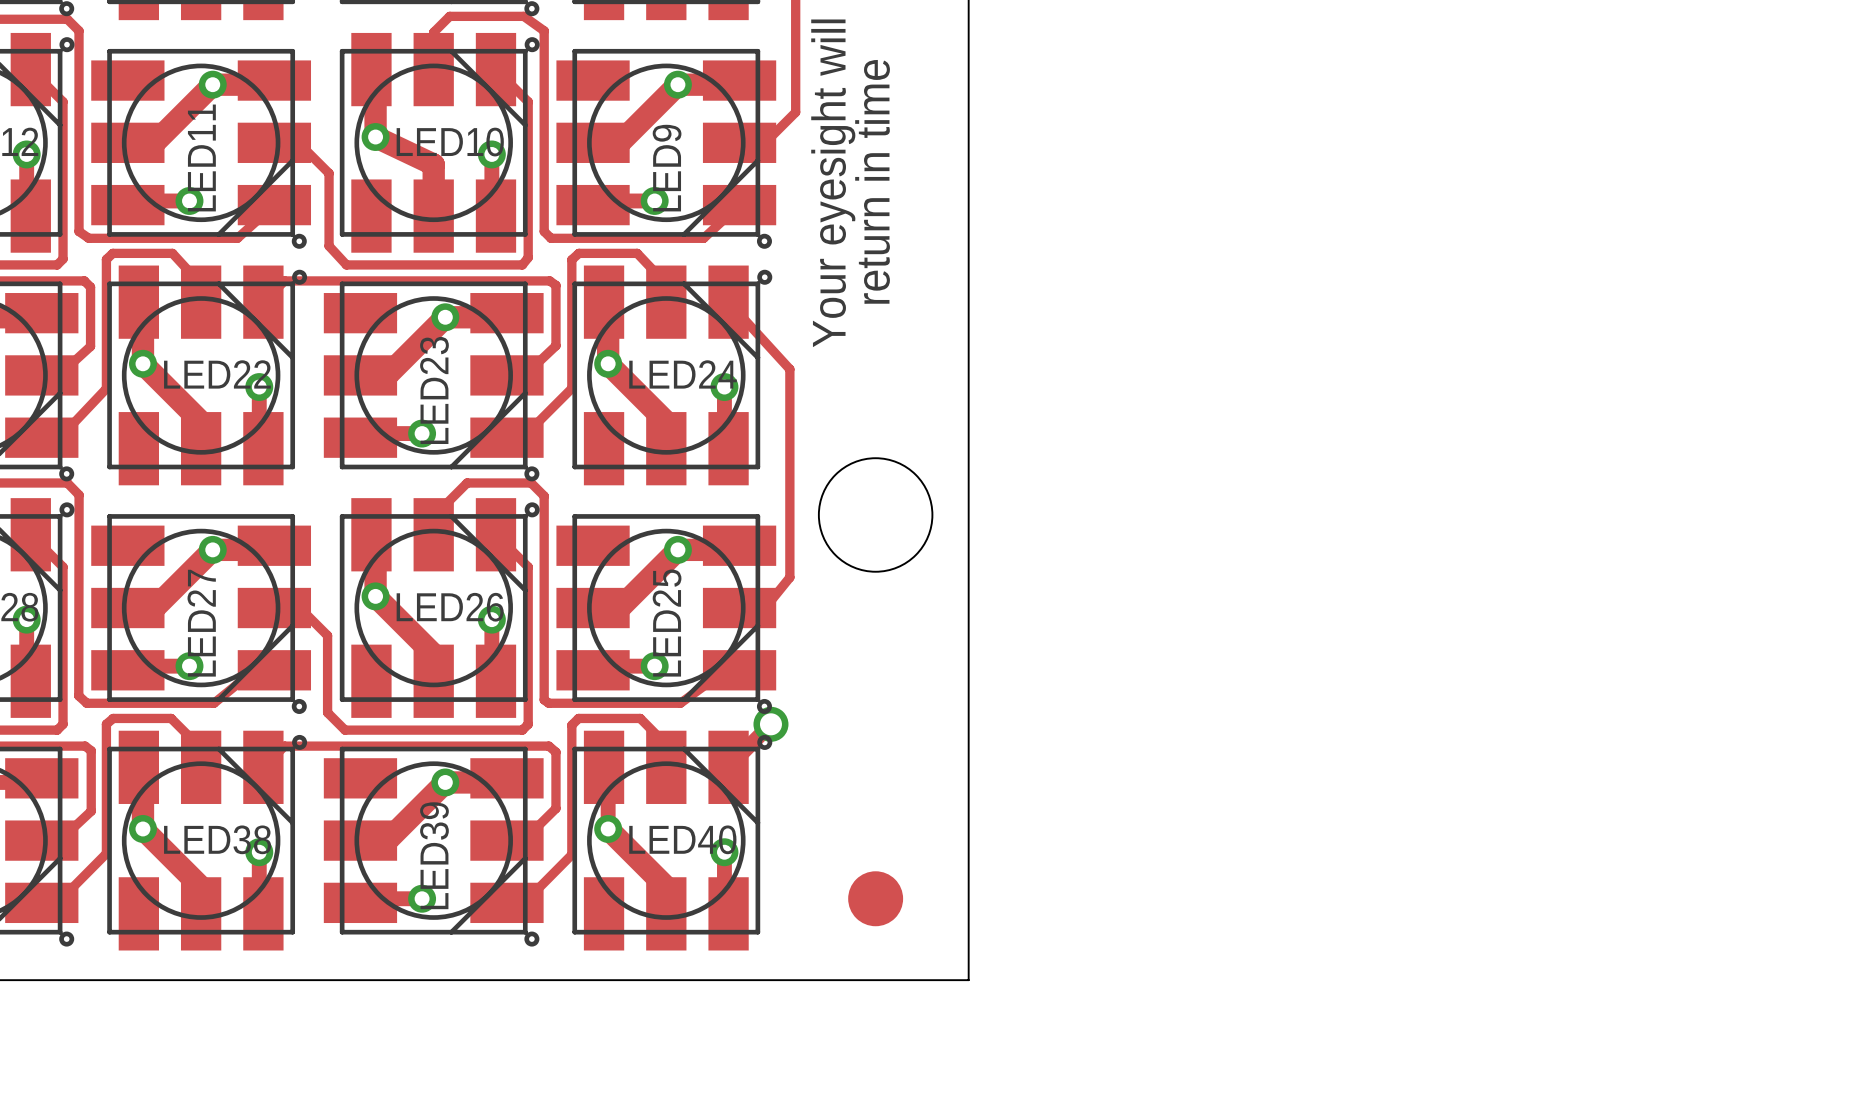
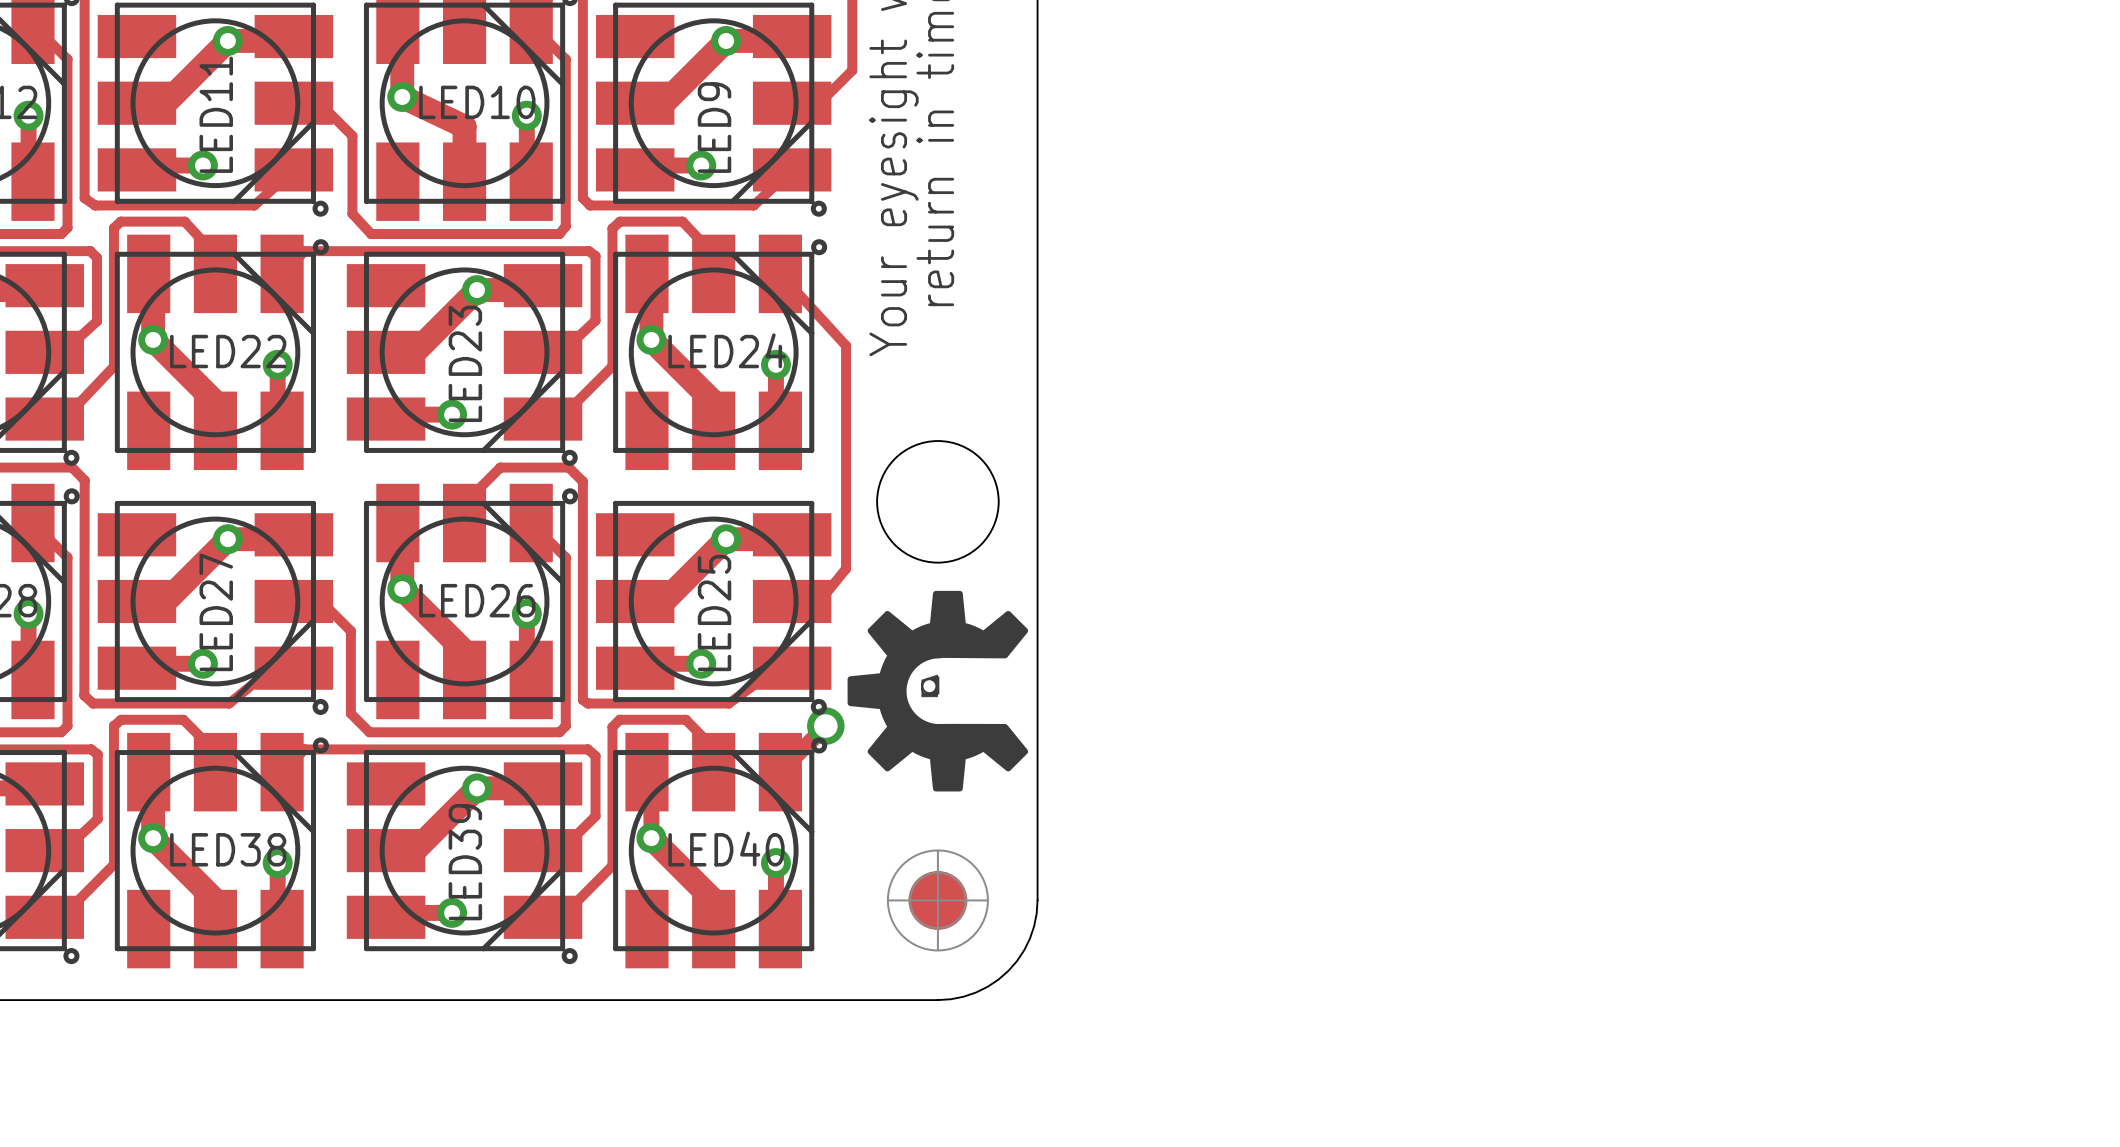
drawing: none -> [847, 590, 1029, 792]
drawing: none -> [886, 849, 989, 952]
board edge: (968, 887) (968, 980) (875, 980) -> (1037, 900) (1034, 926) (1029, 938) (1016, 961) (1008, 970) (998, 979) (976, 992) (963, 996) (937, 1000)
part: (875, 898) -> none

